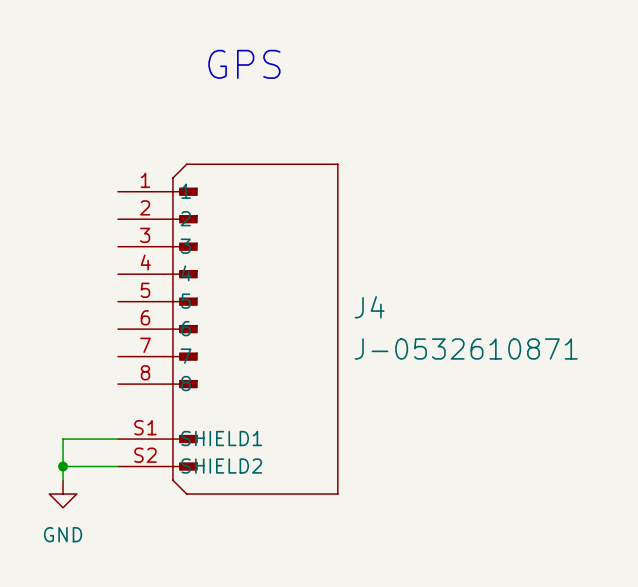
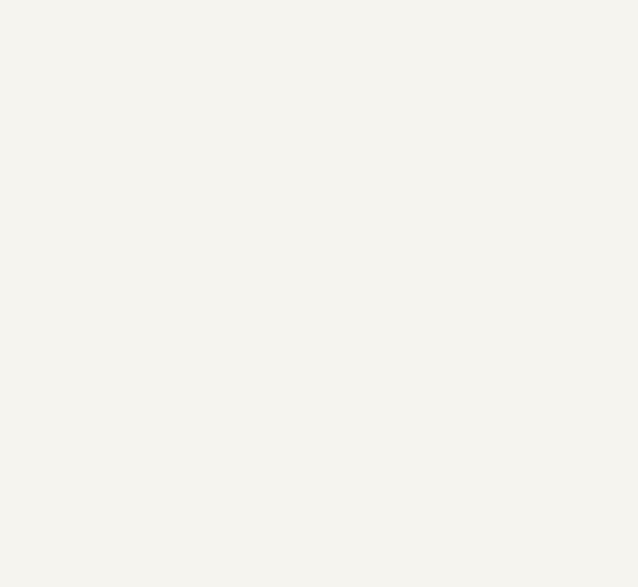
text: GPS (244, 64) -> none
J4: J-0532610871 (227, 329) -> none
wire: (117, 439) (63, 439) (63, 480) -> none
wire: (63, 466) (117, 466) -> none
junction: (63, 466) -> none
power symbol: GND (63, 494) -> none

